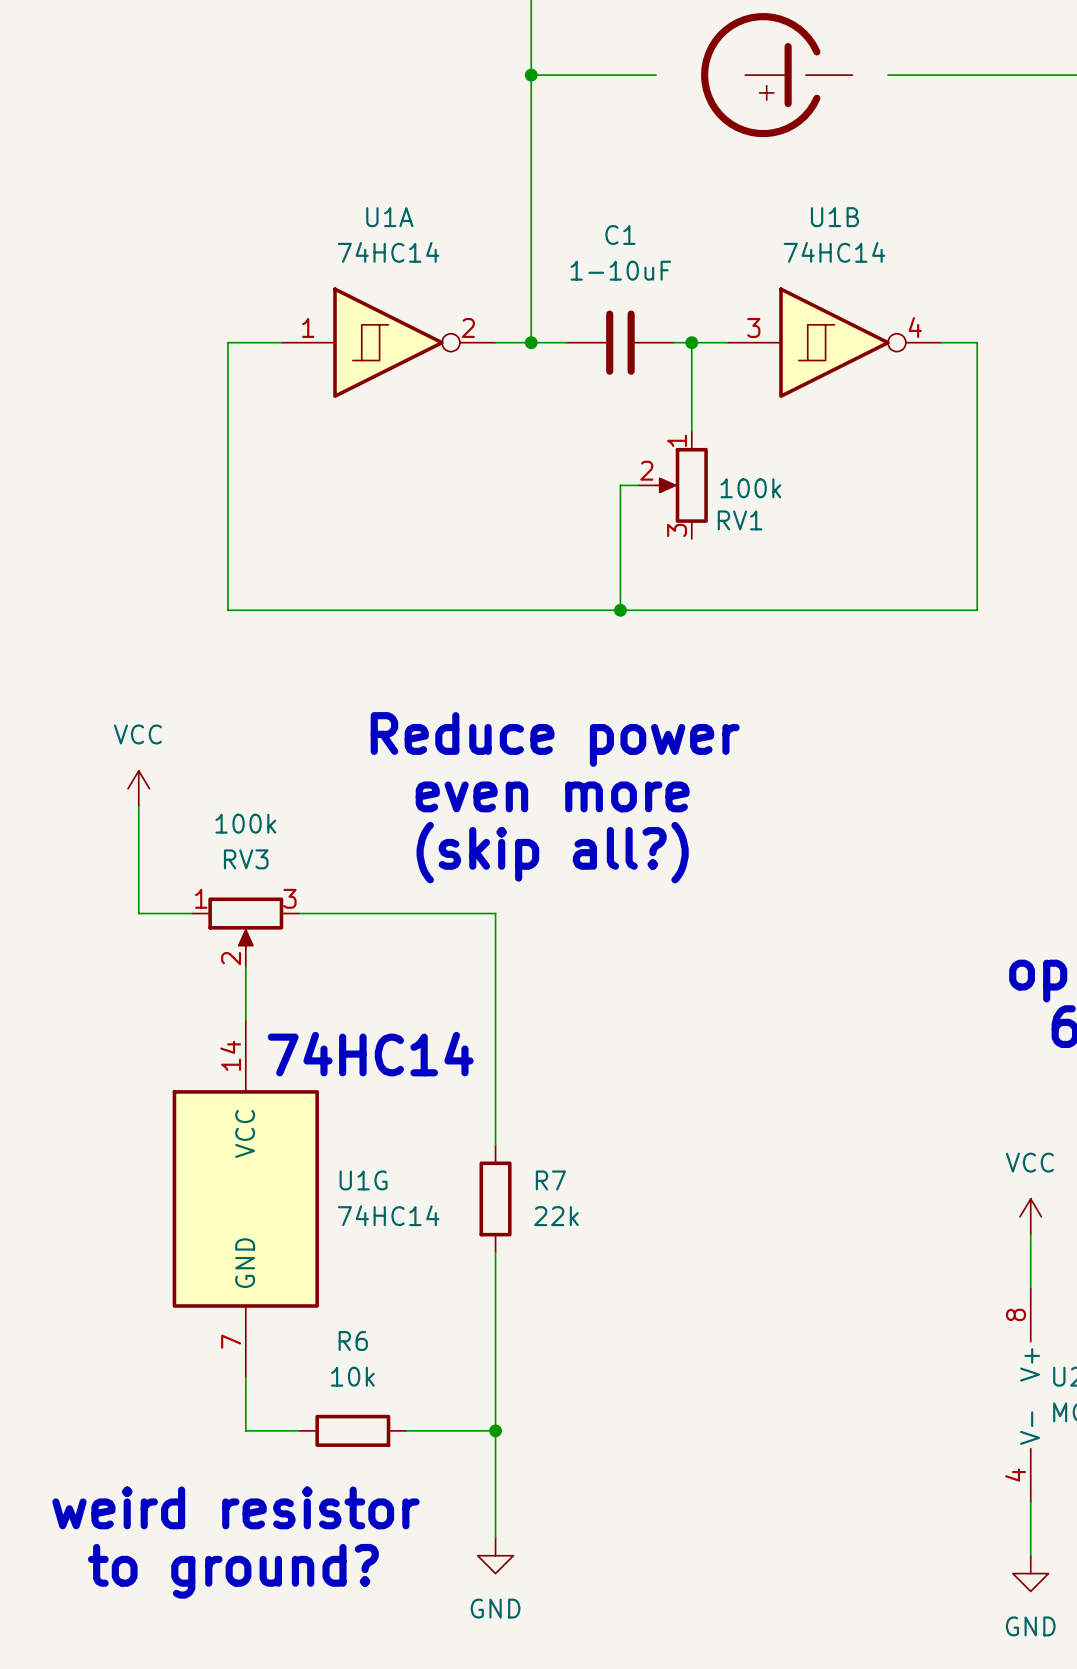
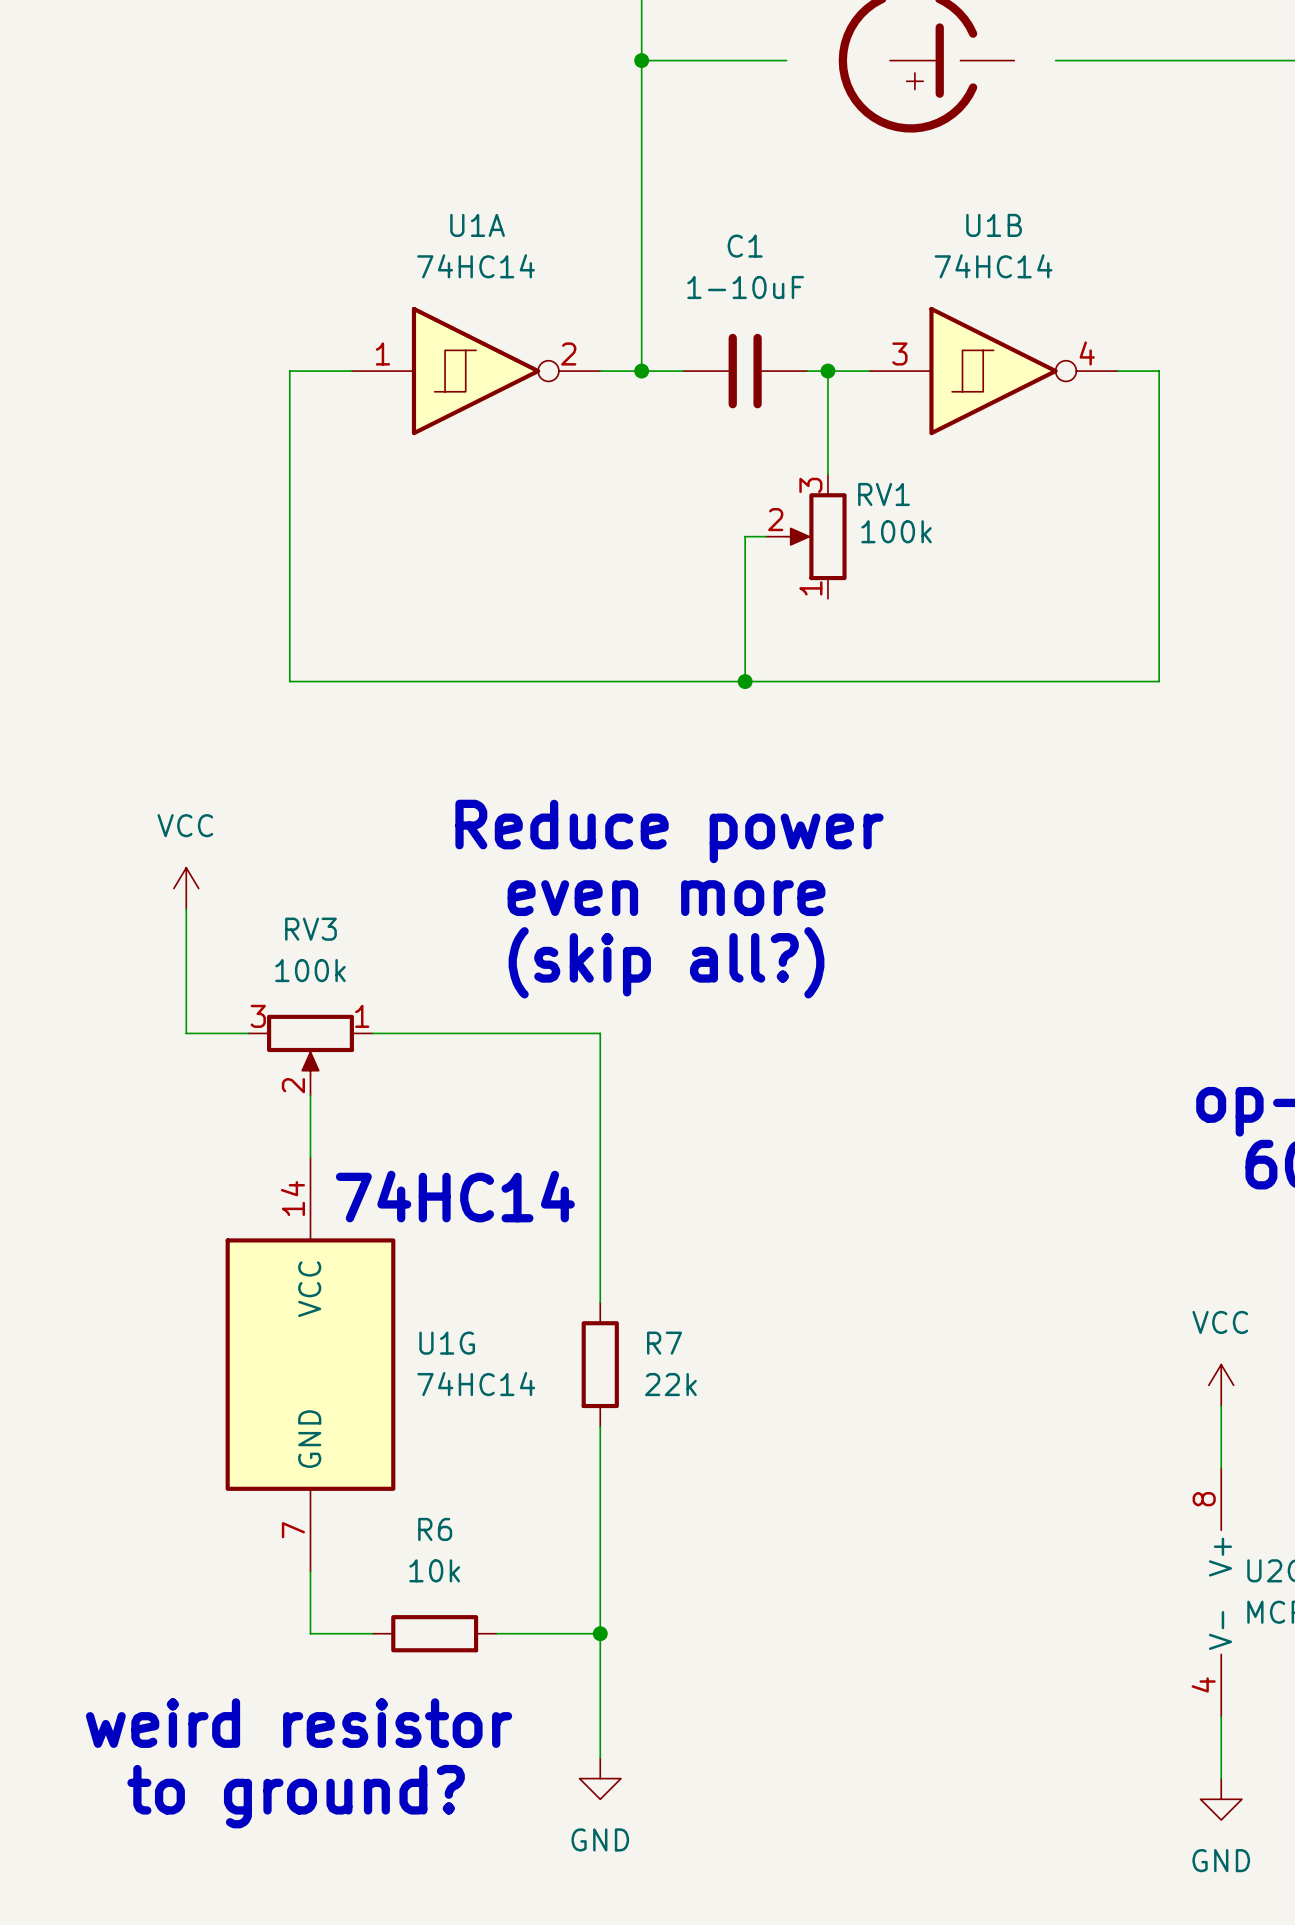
RV1 flip: as is (681, 485) -> up-down (816, 536)
RV3 value position: 100k (245, 823) -> 100k (310, 970)
RV3 name position: RV3 (246, 859) -> RV3 (310, 929)
RV3 flip: as is (245, 923) -> left-right (310, 1044)

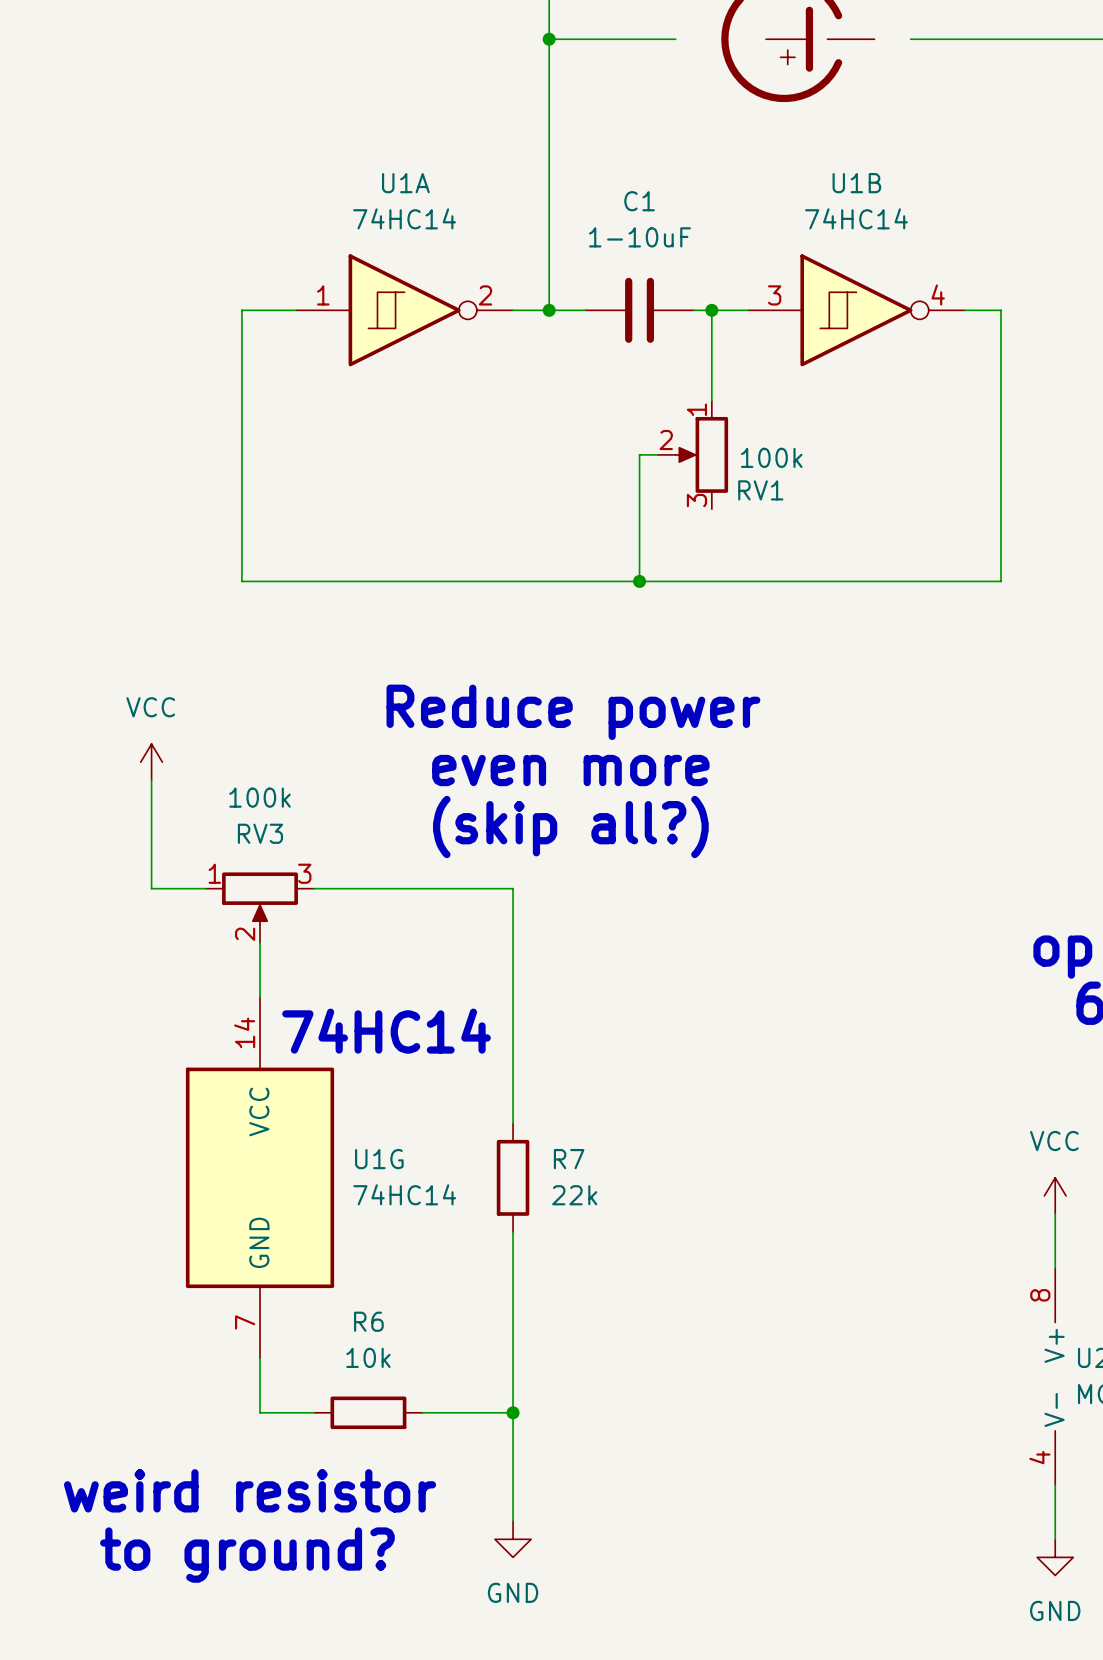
RV1 flip: as is (816, 536) -> up-down (701, 454)
RV3 name position: RV3 (310, 929) -> RV3 (260, 833)
RV3 value position: 100k (310, 970) -> 100k (260, 797)
RV3 flip: as is (310, 1044) -> left-right (260, 898)

